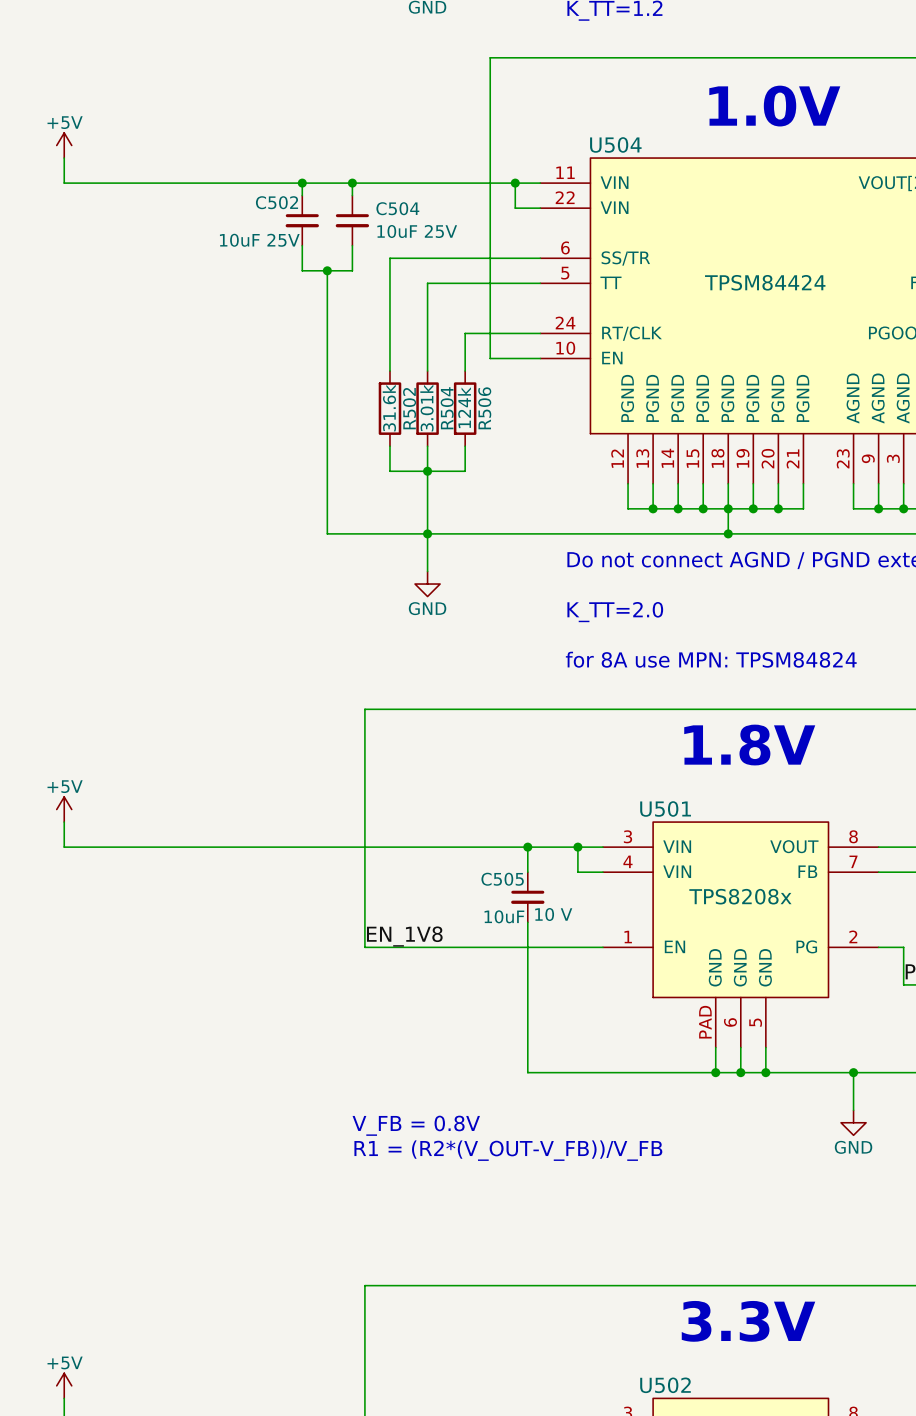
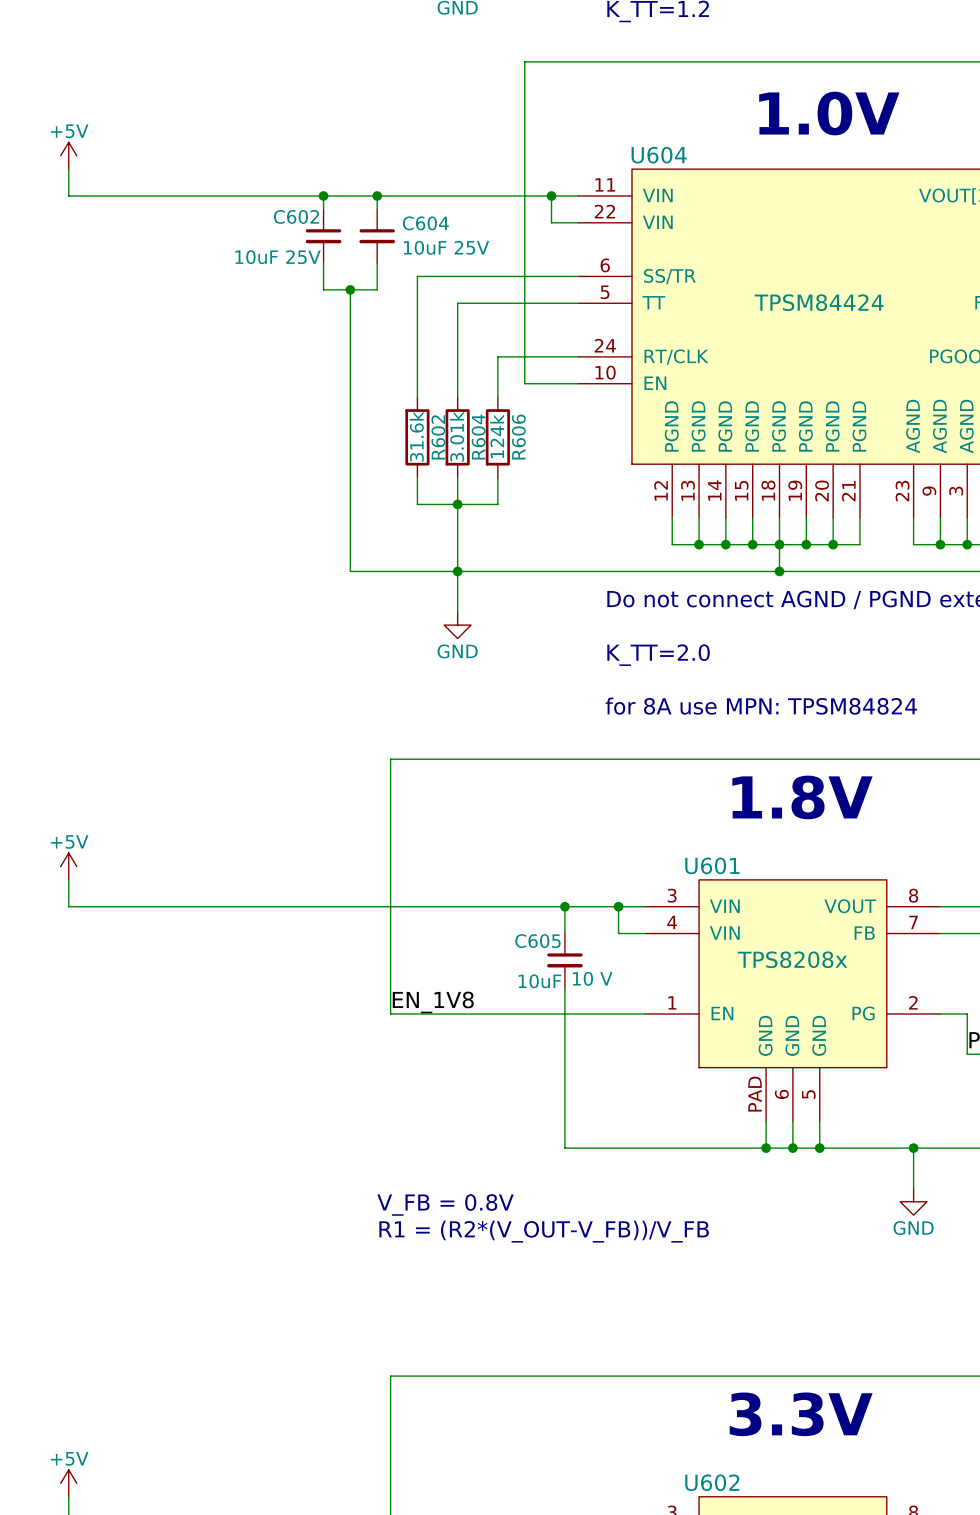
U504 name: U504 (615, 144) -> U604 (659, 155)
C502 name: C502 (277, 202) -> C602 (296, 216)
C504 name: C504 (397, 208) -> C604 (425, 223)
R502 name: R502 (409, 408) -> R602 (438, 437)
R504 name: R504 (447, 408) -> R604 (478, 436)
R506 name: R506 (484, 408) -> R606 (518, 437)
U501 name: U501 (665, 808) -> U601 (712, 865)
C505 name: C505 (502, 879) -> C605 (537, 941)
U502 name: U502 (665, 1385) -> U602 (712, 1482)

